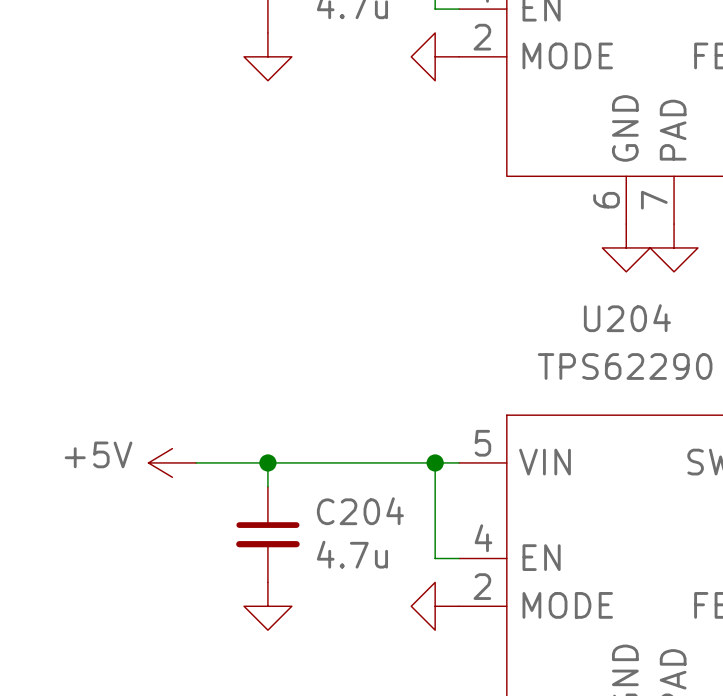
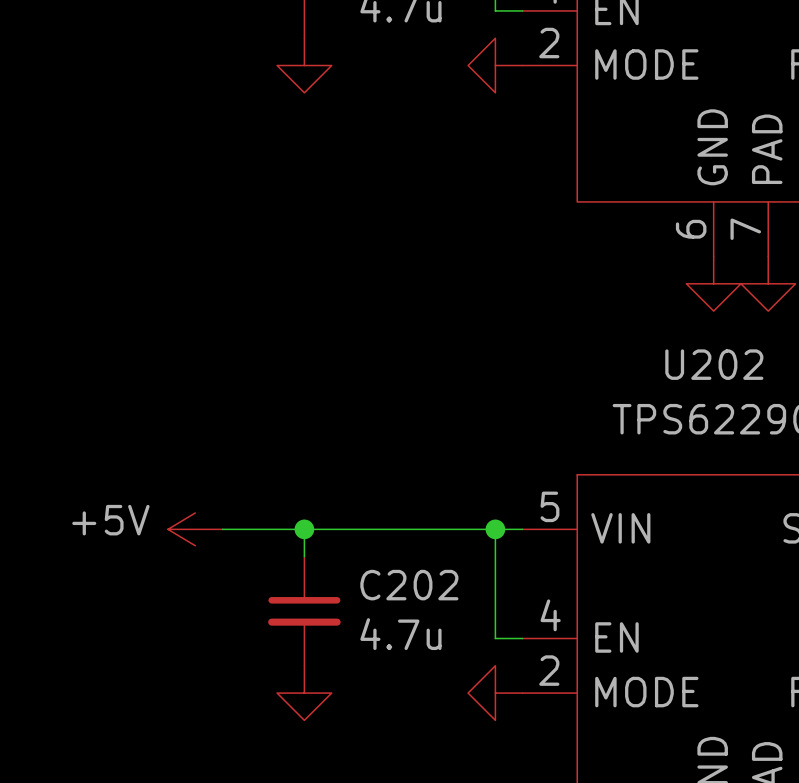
U204 name: U204 (627, 318) -> U202 (714, 364)
C204 name: C204 (360, 511) -> C202 (409, 585)

